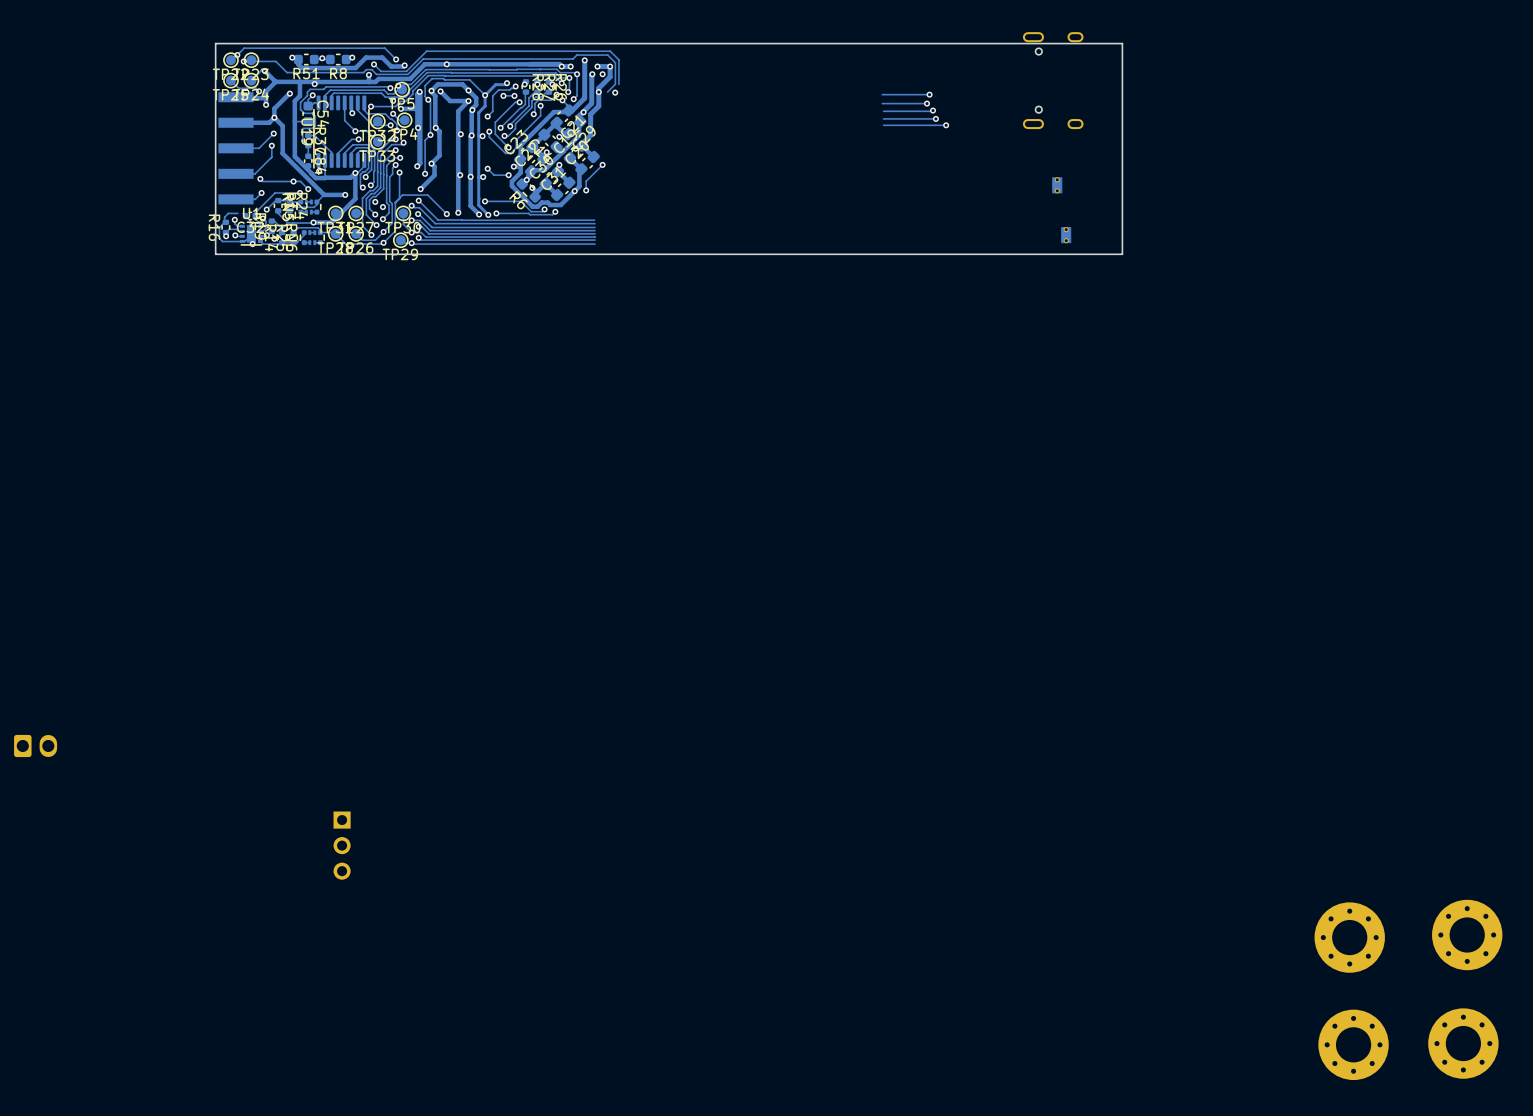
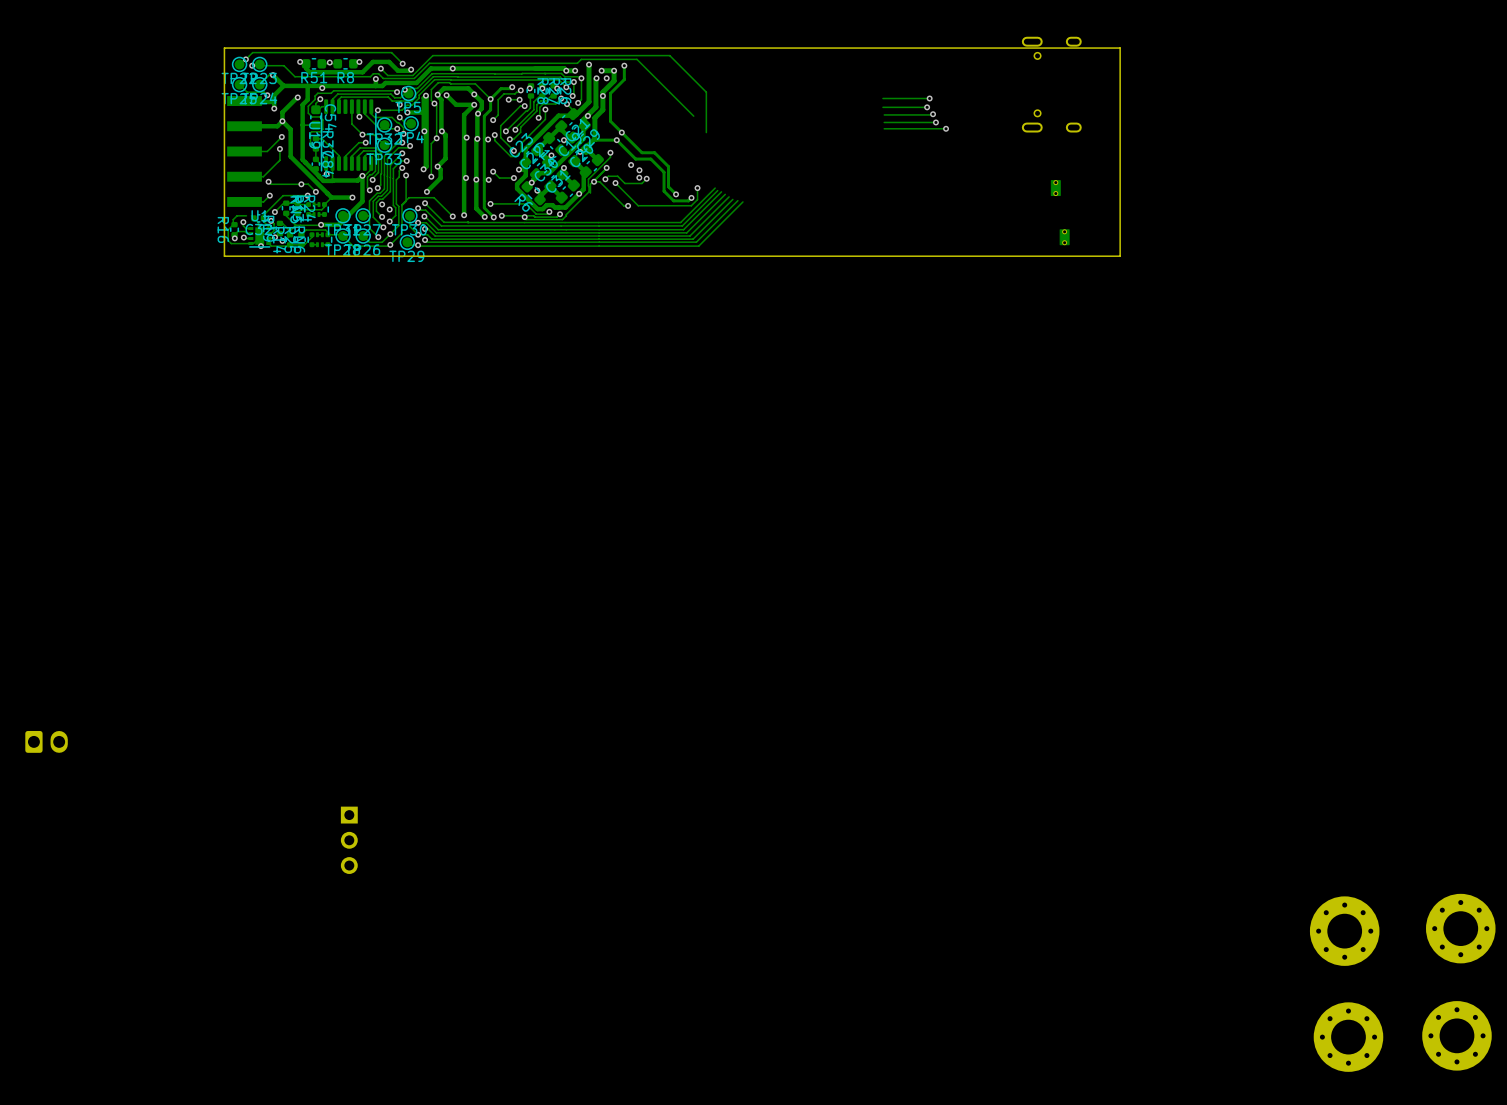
track: (610, 51) (618, 59) (618, 84) -> (614, 55) (669, 55) (706, 92) (706, 132)
track: (607, 55) (615, 62) (615, 84) (607, 92) -> (611, 59) (636, 59) (693, 116)
track: none -> (624, 65) (624, 79) (610, 93) (610, 121) (642, 152) (654, 152) (668, 166) (668, 186) (676, 194)
via: none -> (624, 65)
via: (615, 92) -> none
via: none -> (621, 132)
track: none -> (594, 138) (616, 140) (635, 159) (650, 159) (664, 172) (664, 191) (673, 200) (688, 200) (691, 197)
via: none -> (616, 140)
track: none -> (610, 152) (610, 157) (588, 179) (589, 191) (562, 219) (525, 219) (524, 217)
via: none -> (610, 152)
via: none -> (631, 165)
track: none -> (606, 168) (594, 181) (599, 181) (623, 205) (628, 205)
via: none -> (639, 170)
via: none -> (639, 177)
track: none -> (646, 178) (641, 183) (624, 183) (617, 176) (608, 176) (605, 179)
via: none -> (646, 178)
via: none -> (605, 179)
via: none -> (594, 181)
track: none -> (615, 183) (638, 205) (691, 205) (697, 199) (697, 188)
via: none -> (615, 183)
via: none -> (697, 188)
track: none -> (715, 188) (680, 222) (598, 222)
track: none -> (717, 190) (682, 225) (599, 225)
track: none -> (721, 191) (683, 229) (599, 229)
via: (586, 190) -> none
via: none -> (676, 194)
track: none -> (725, 194) (686, 232) (599, 232)
track: none -> (729, 196) (689, 236) (599, 236)
via: none -> (691, 197)
track: none -> (732, 199) (693, 239) (599, 239)
track: none -> (737, 200) (696, 242) (599, 242)
track: none -> (742, 201) (698, 246) (599, 246)
via: none -> (628, 205)
via: none -> (524, 217)

